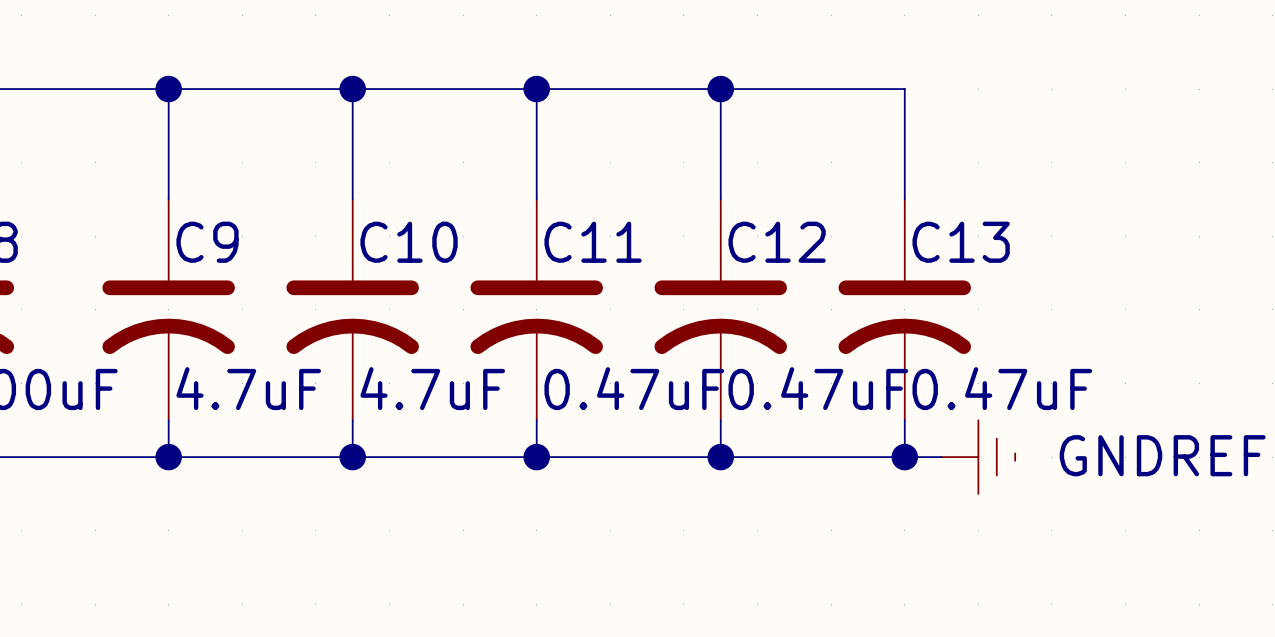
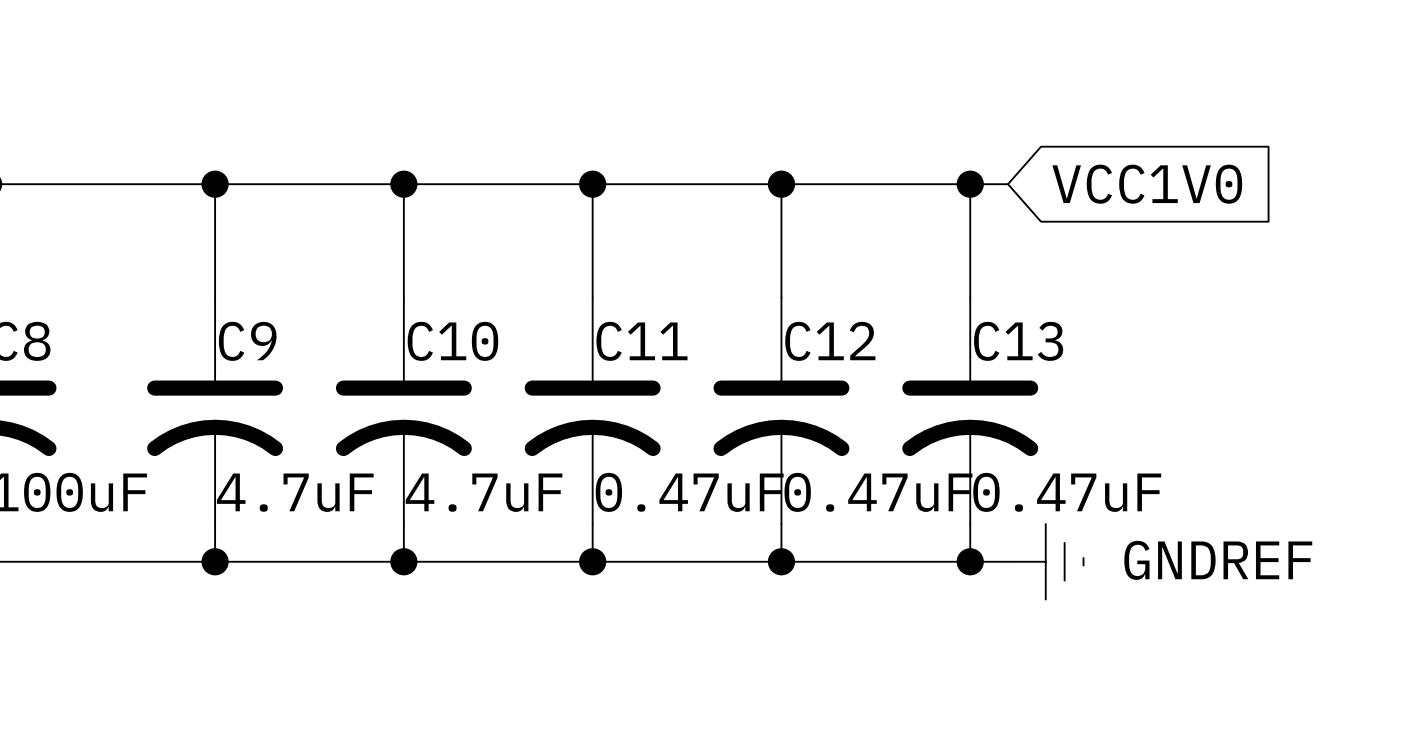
wire: none -> (970, 184) (1008, 184)
junction: none -> (970, 184)
global label: none -> VCC1V0 (1147, 184)

